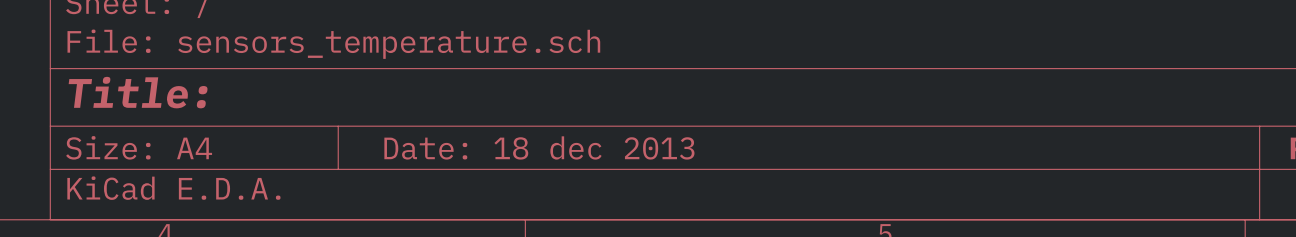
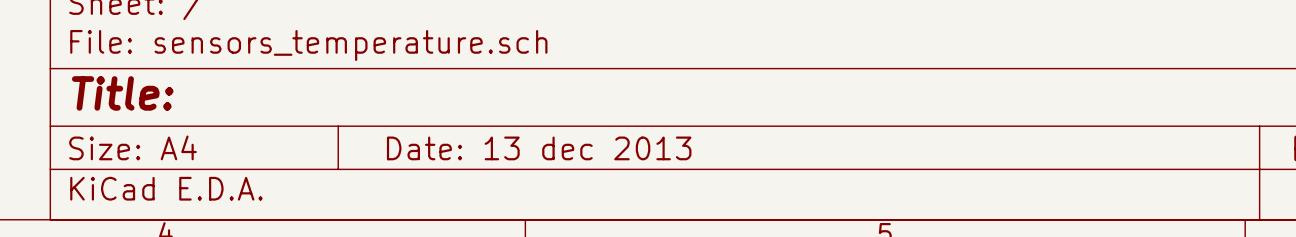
title block: Date: 18 dec 2013 (539, 147) -> Date: 13 dec 2013 (539, 148)

